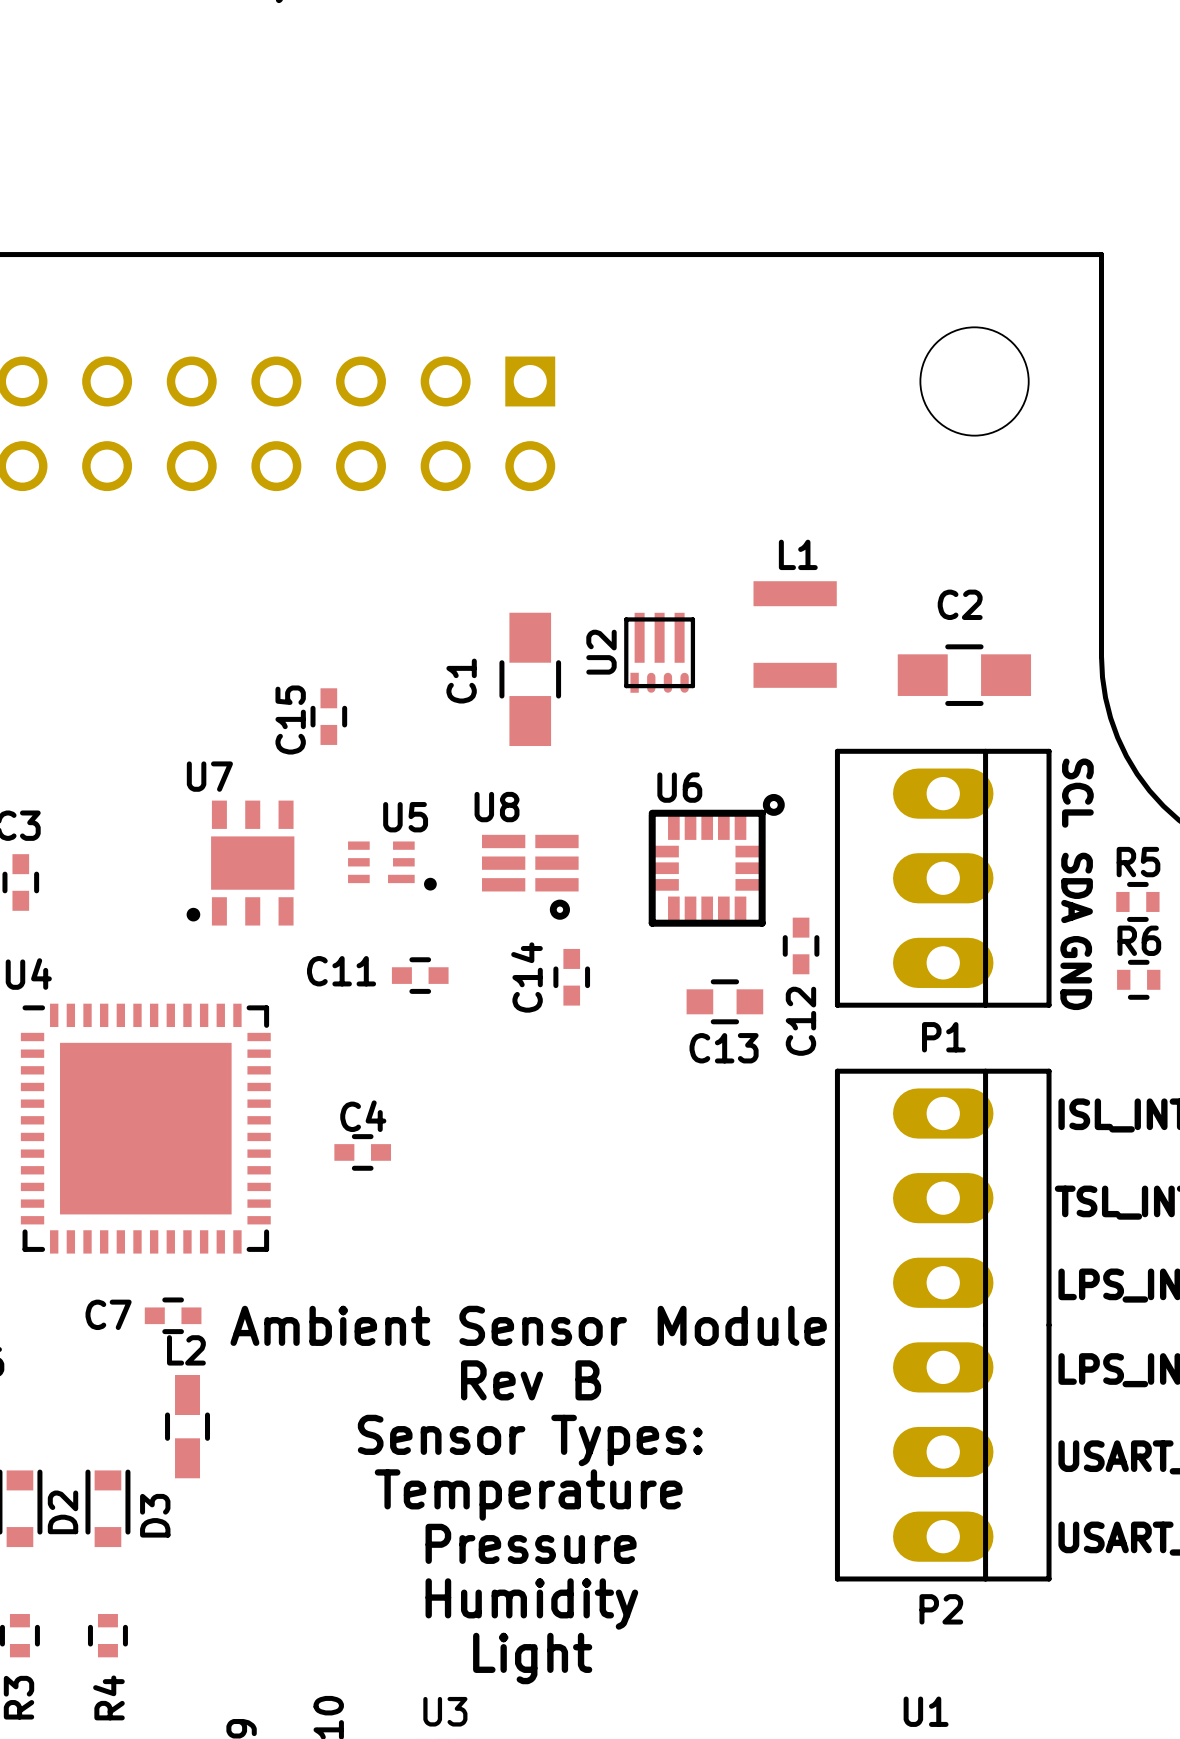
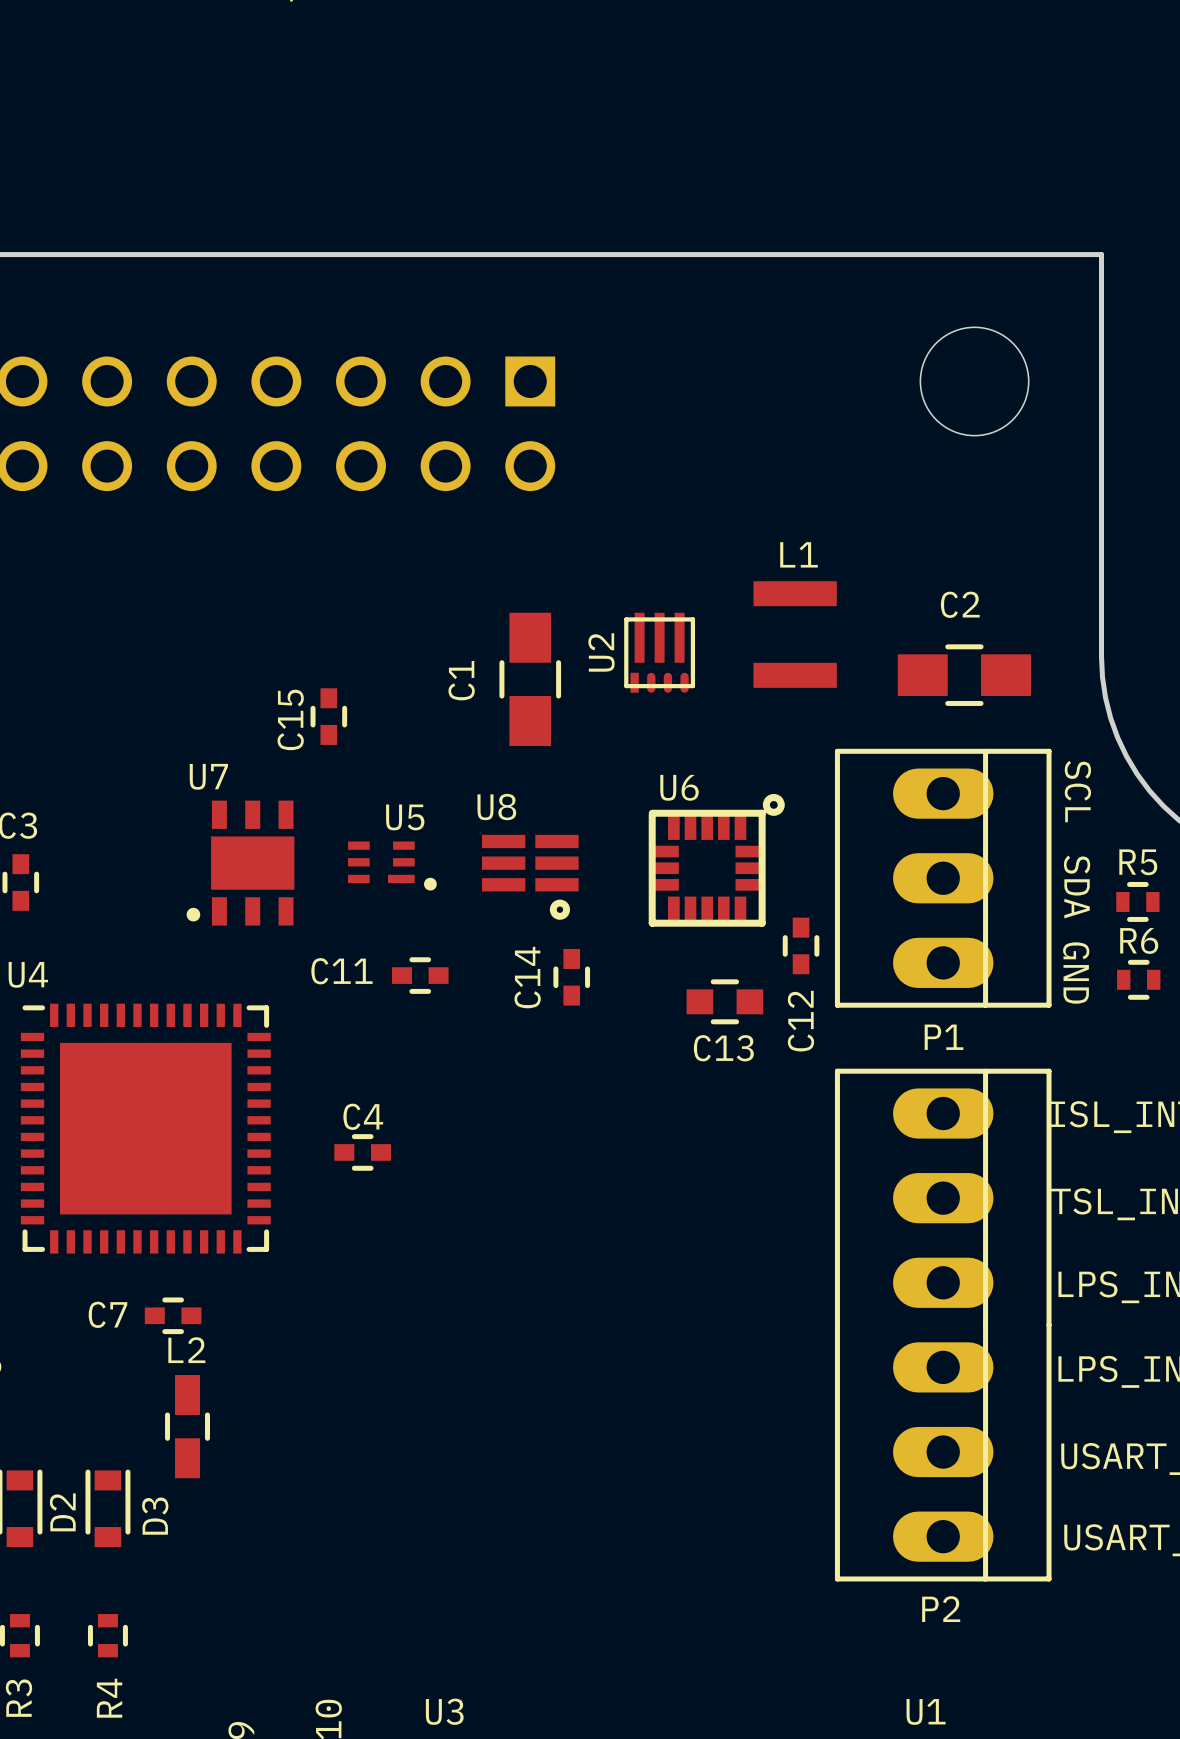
text: Ambient Sensor Module (528, 1325) -> none
text: Rev B (531, 1380) -> none
text: Sensor Types: (530, 1440) -> none
text: Temperature (528, 1495) -> none
text: Pressure (531, 1543) -> none
text: Humidity (531, 1604) -> none
text: Light (532, 1658) -> none

